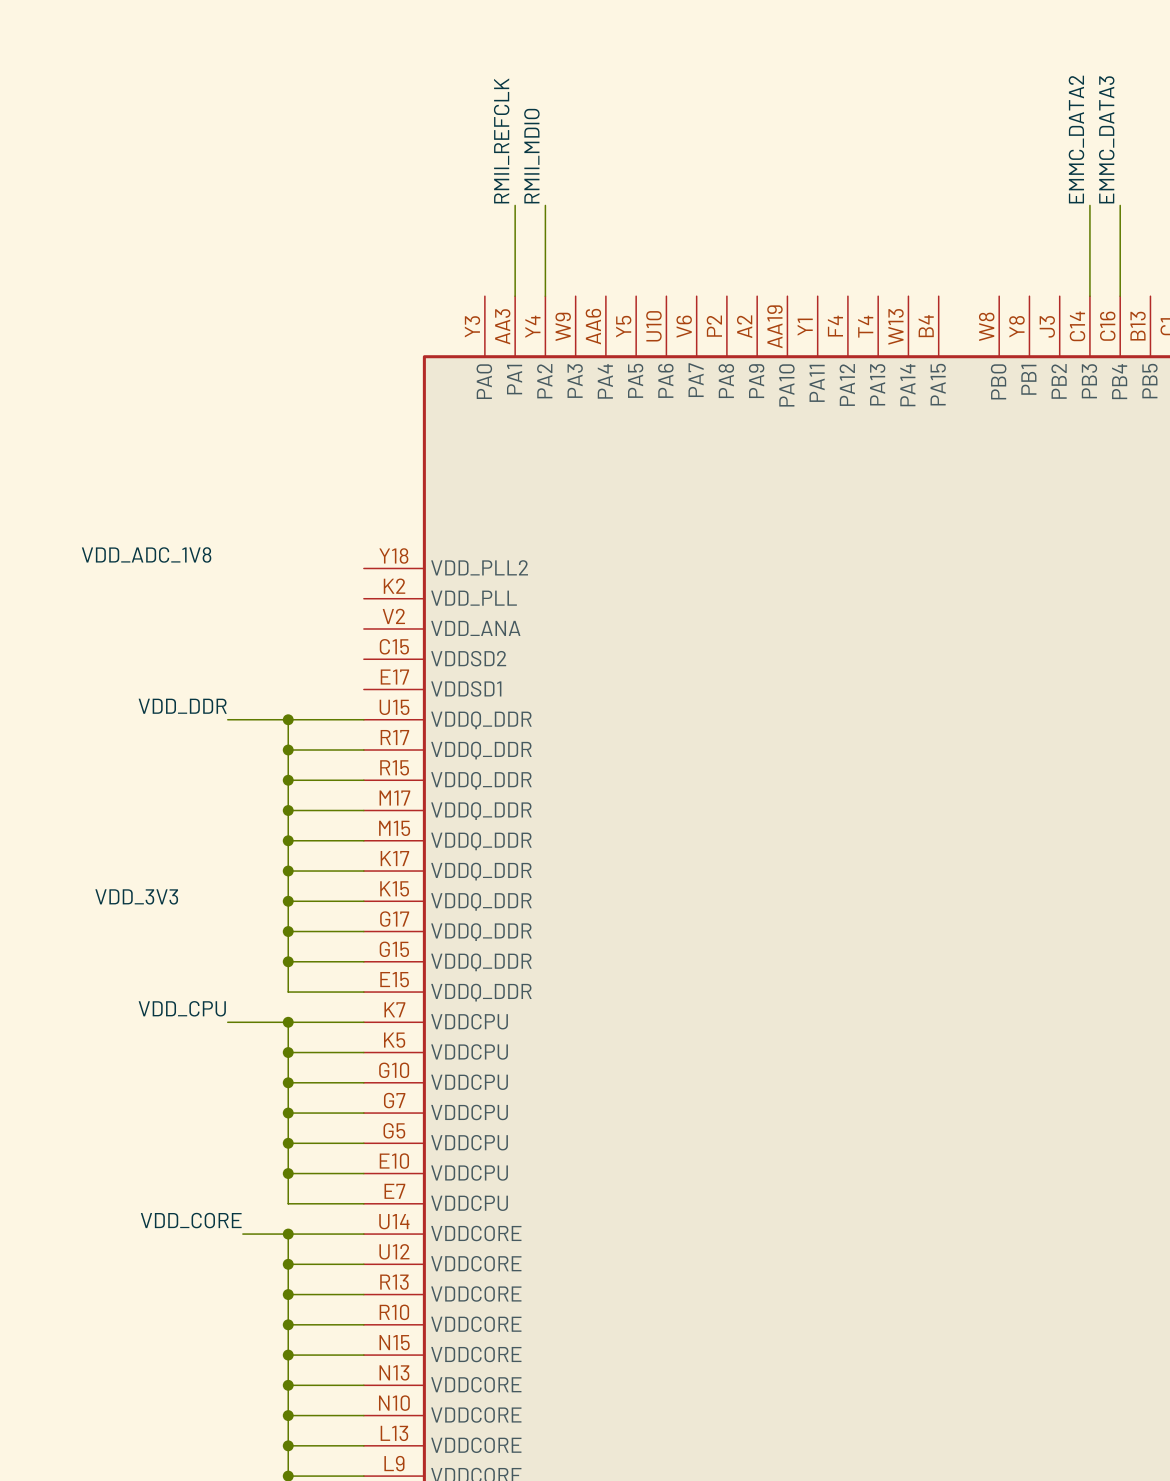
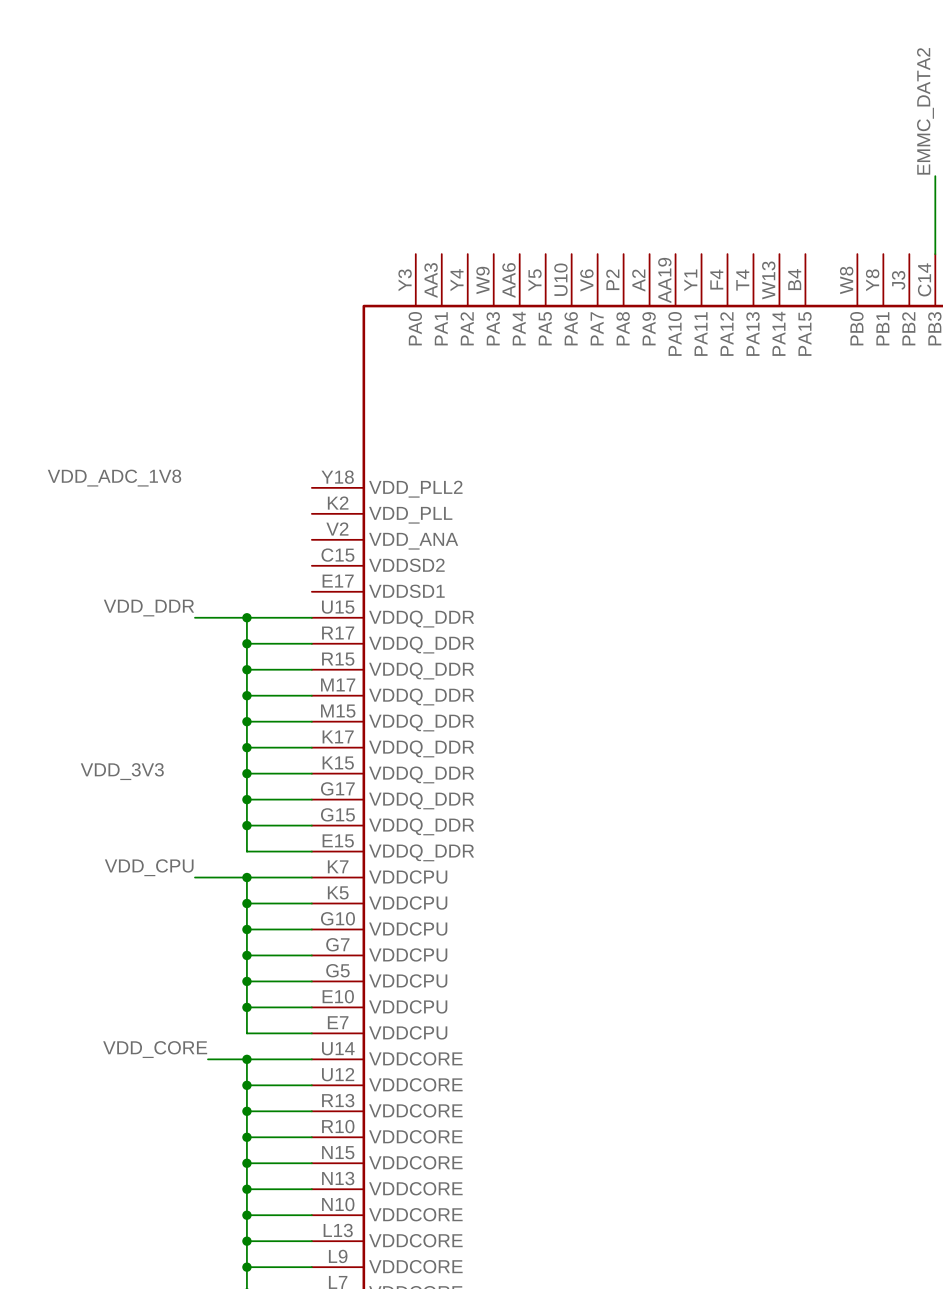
label: RMII_REFCLK (501, 140) -> none
label: RMII_MDIO (531, 156) -> none
wire: (515, 205) (515, 296) -> none
wire: (545, 205) (545, 296) -> none

